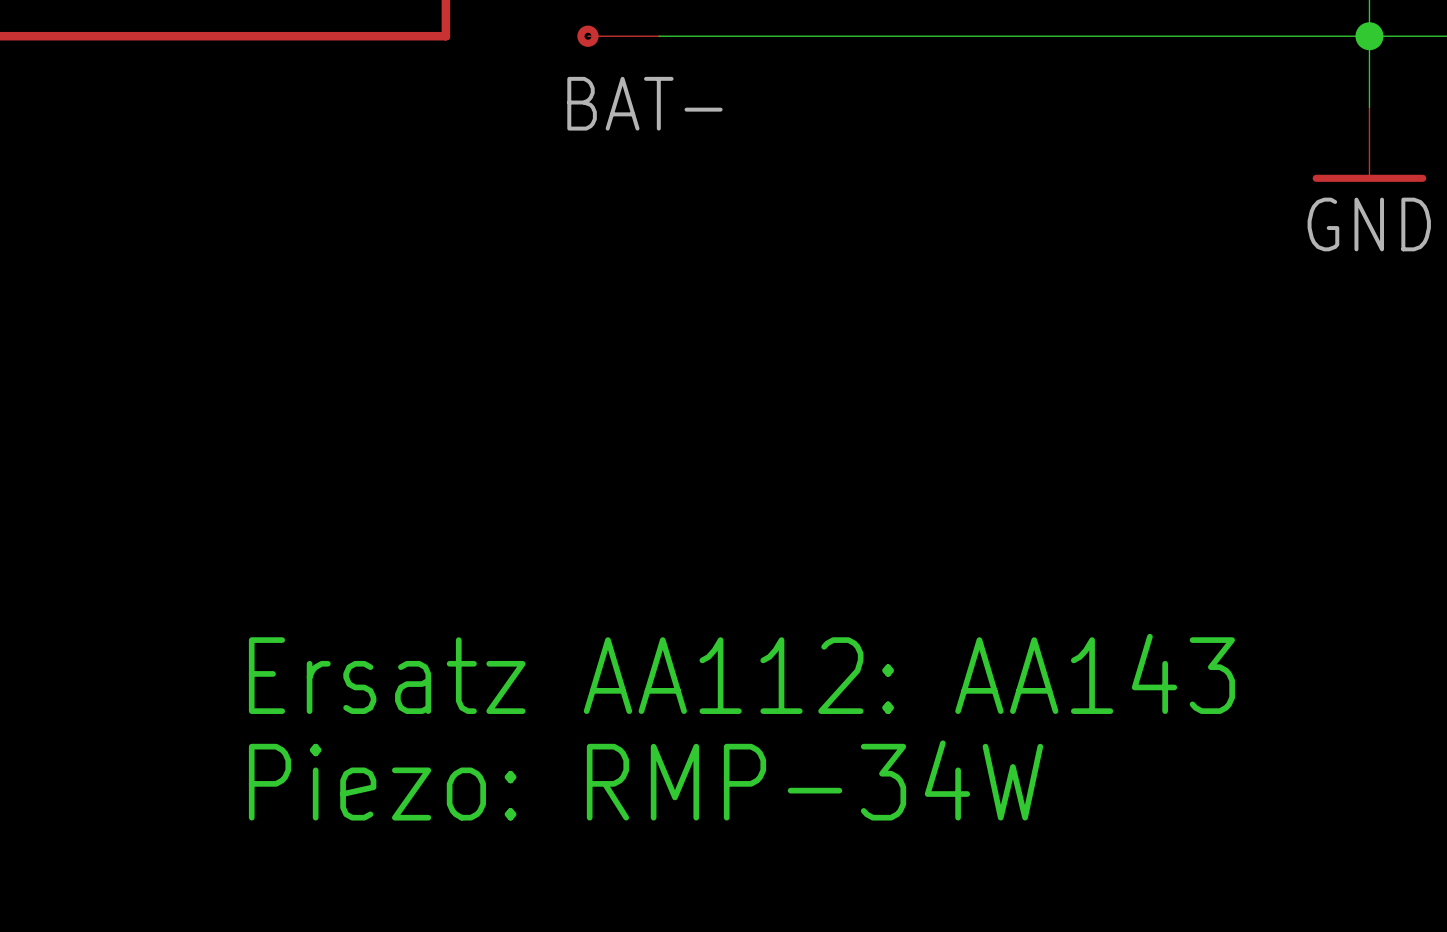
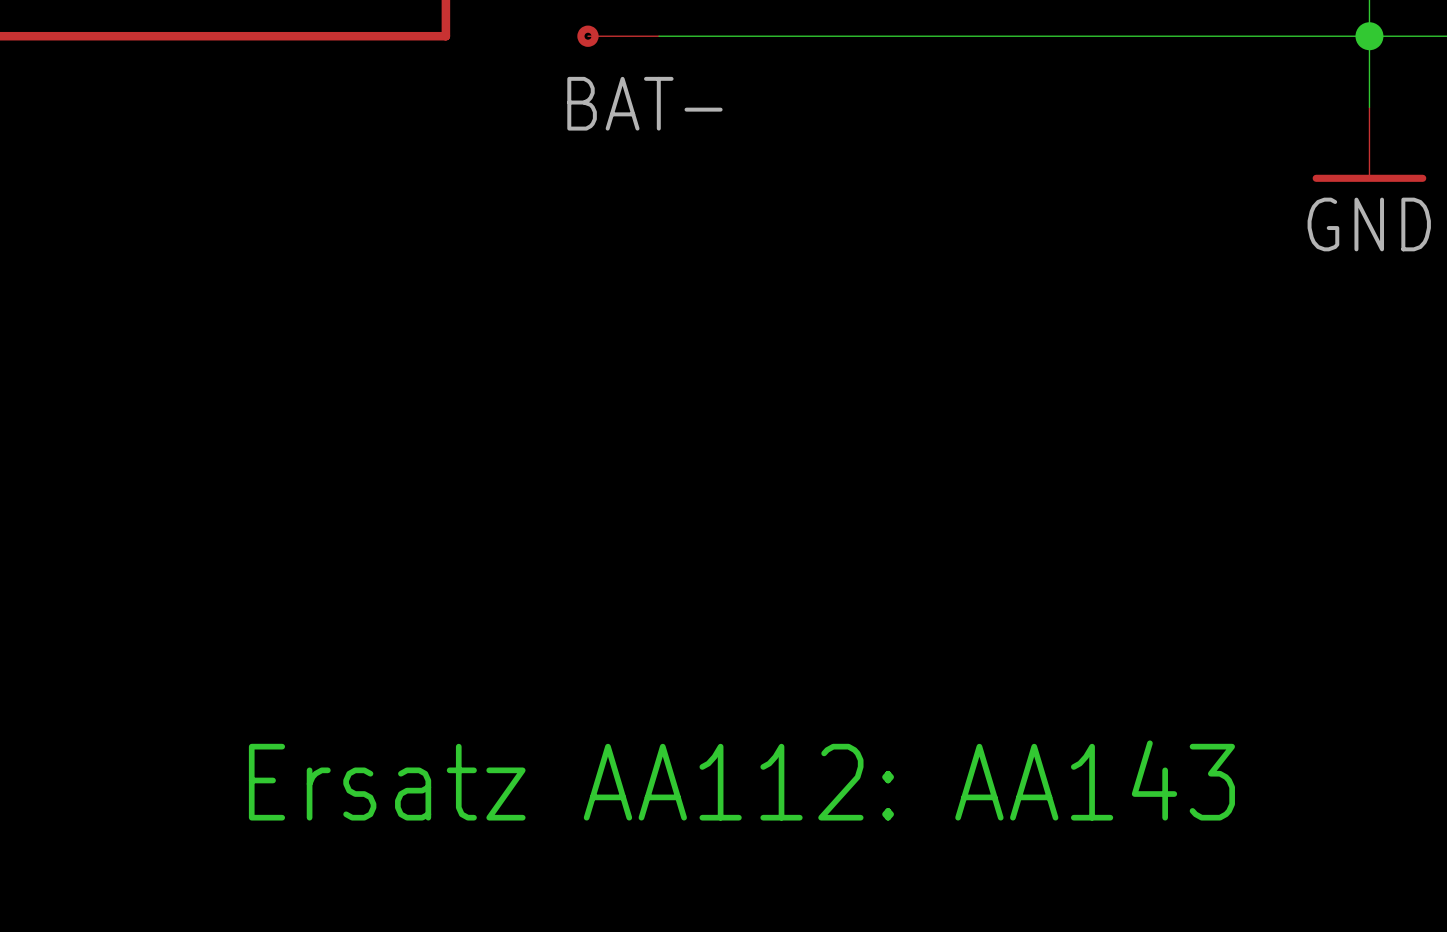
text: Ersatz AA112: AA143 (741, 673) -> none
text: Piezo: RMP-34W (646, 780) -> Ersatz AA112: AA143 (741, 780)

